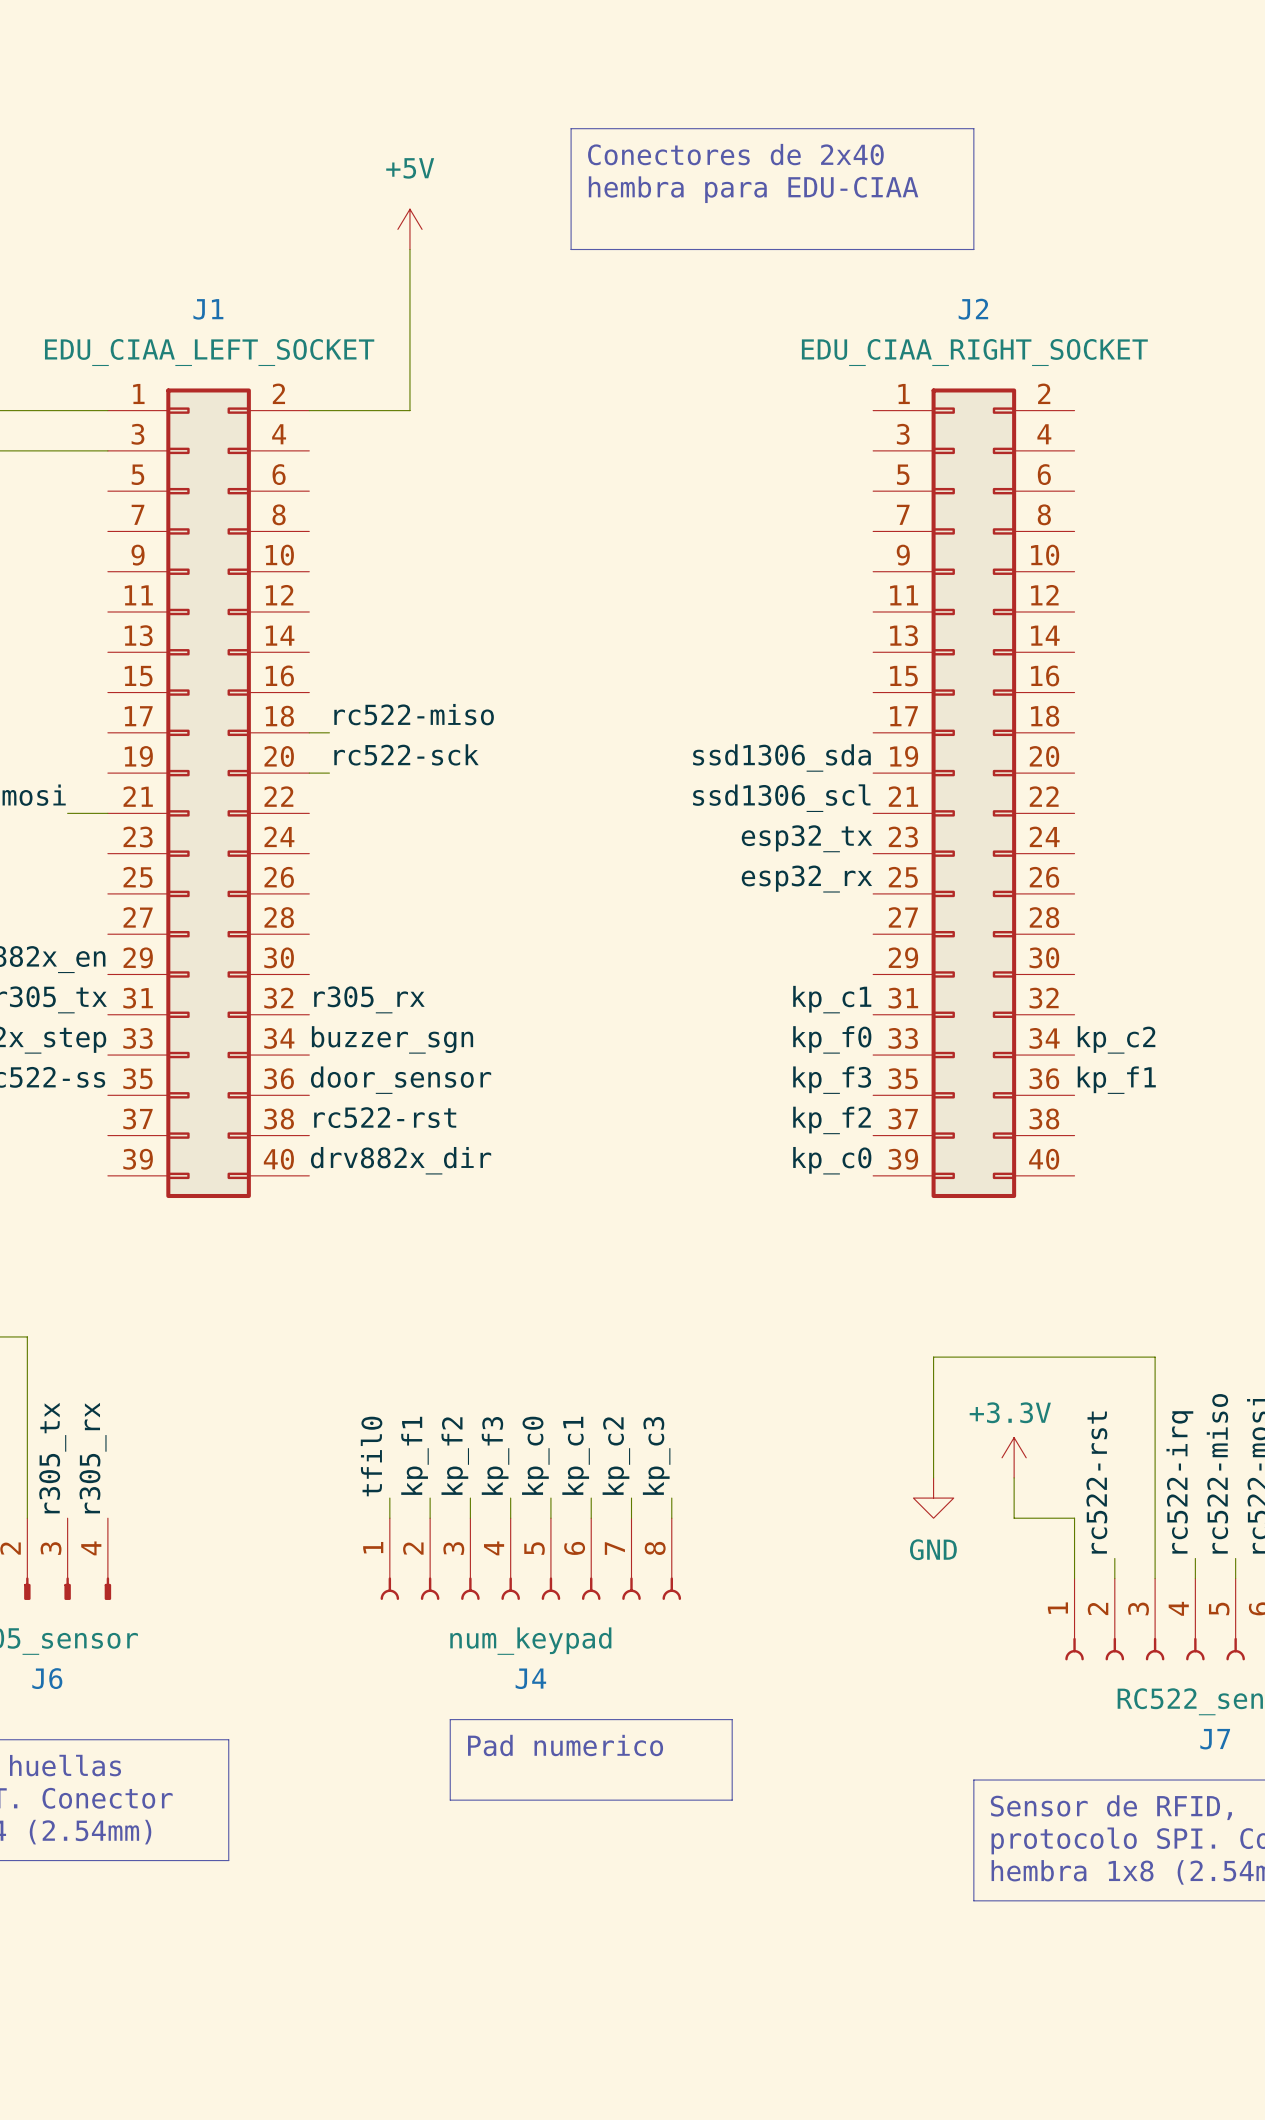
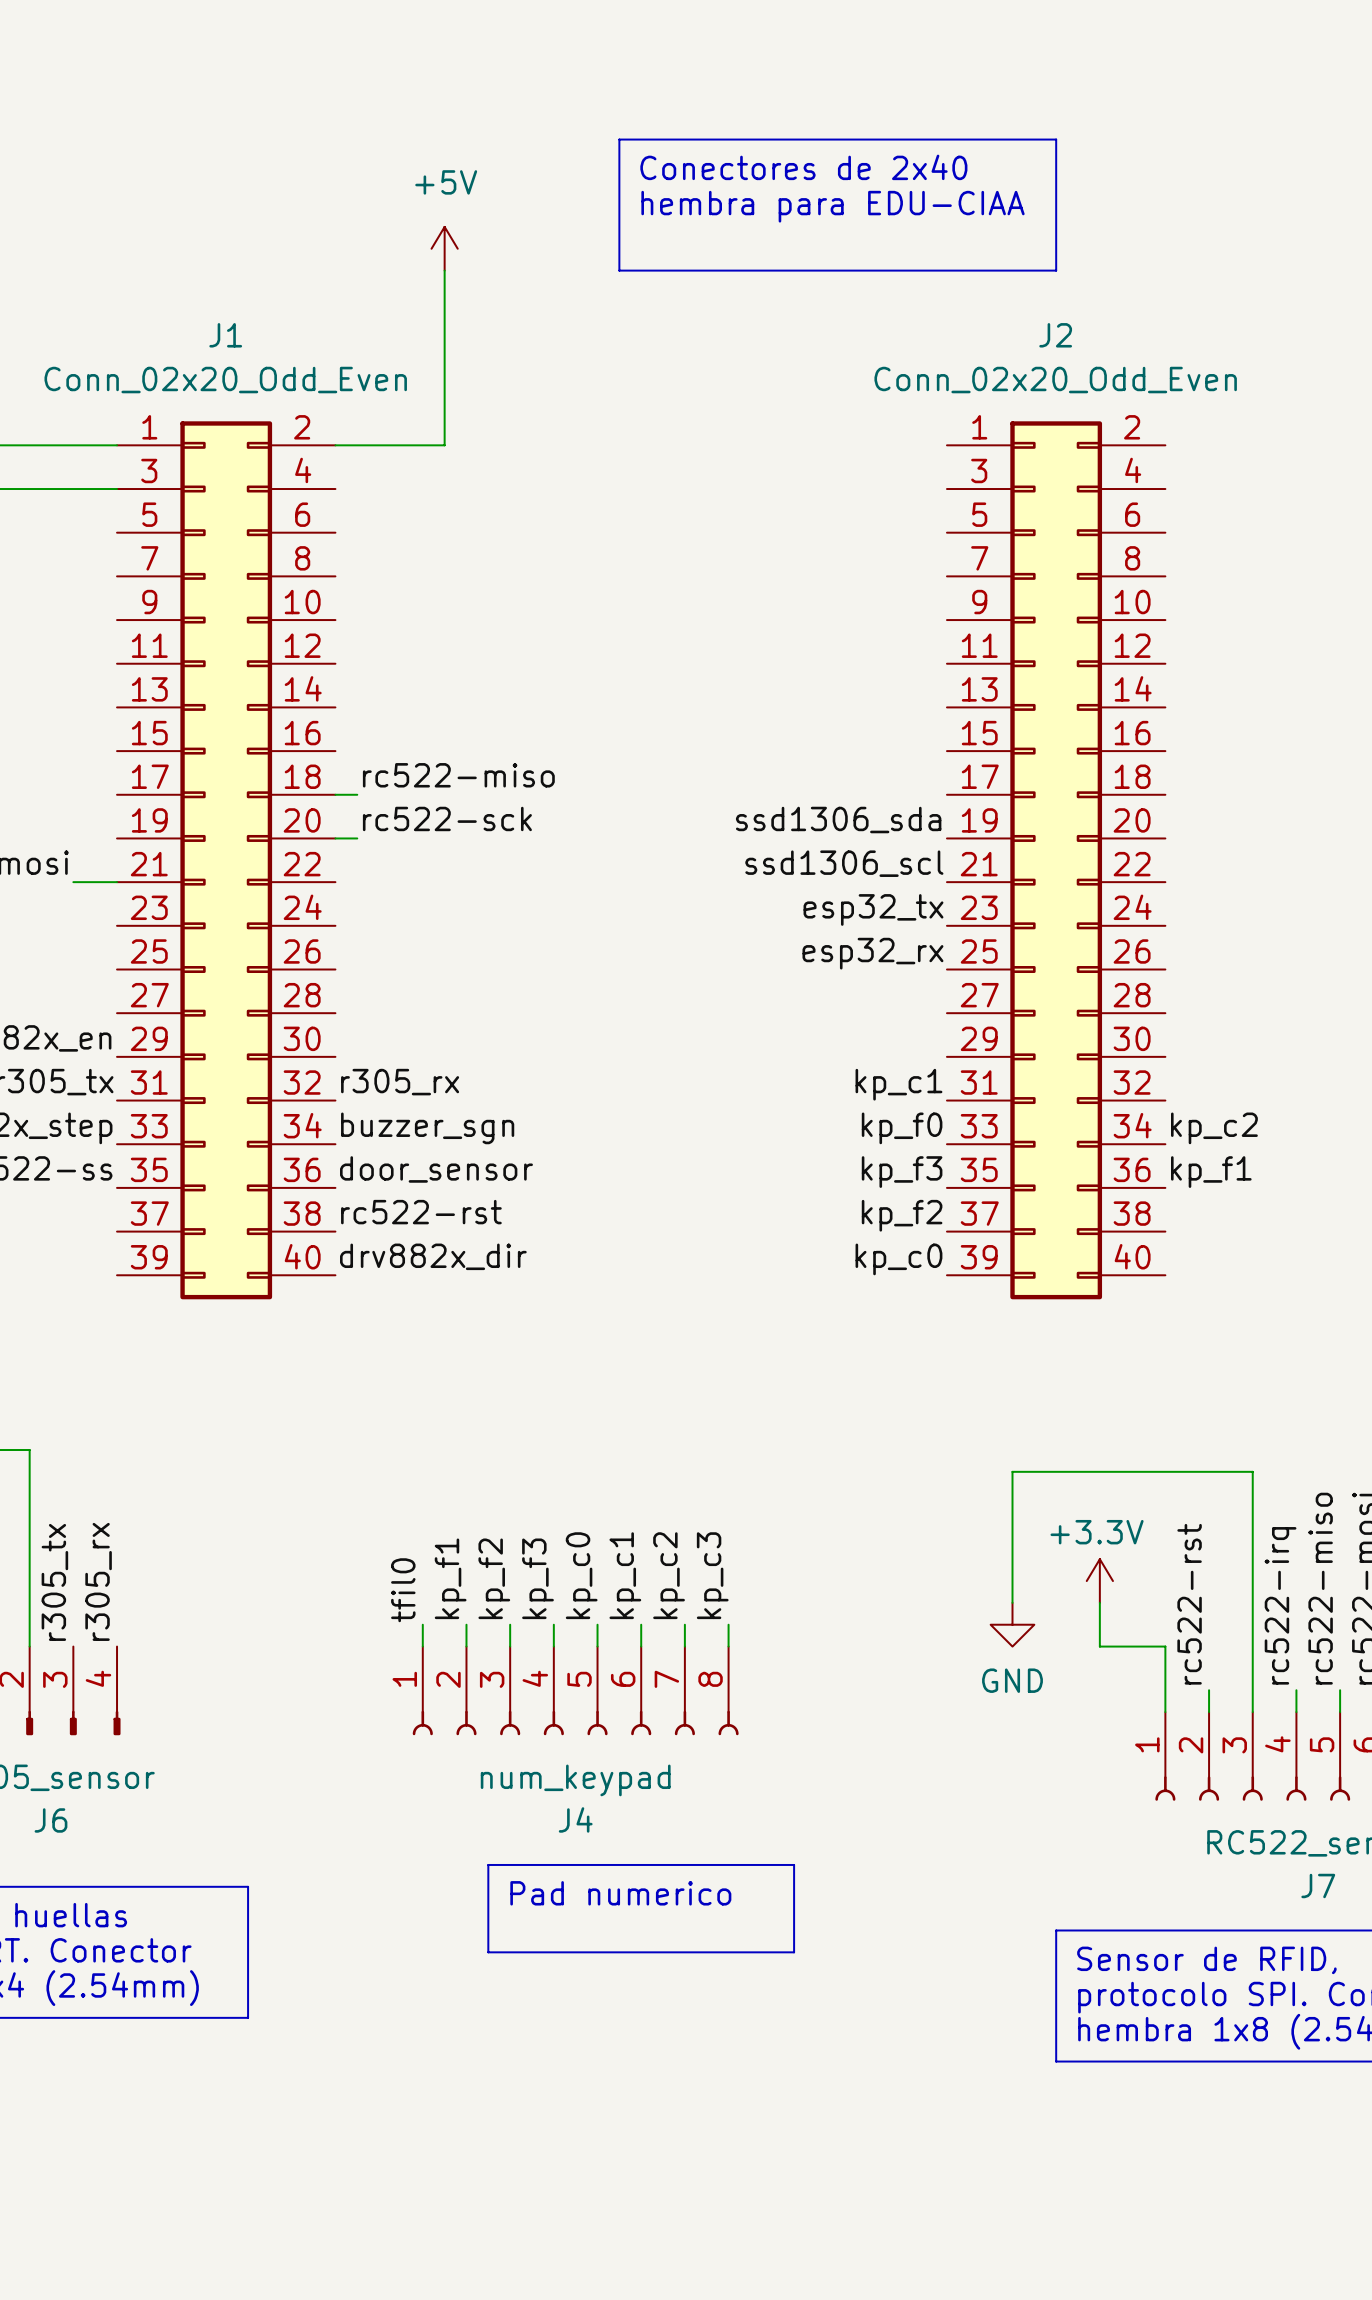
J1 value: EDU_CIAA_LEFT_SOCKET (209, 352) -> Conn_02x20_Odd_Even (225, 380)
J2 value: EDU_CIAA_RIGHT_SOCKET (974, 352) -> Conn_02x20_Odd_Even (1055, 380)

